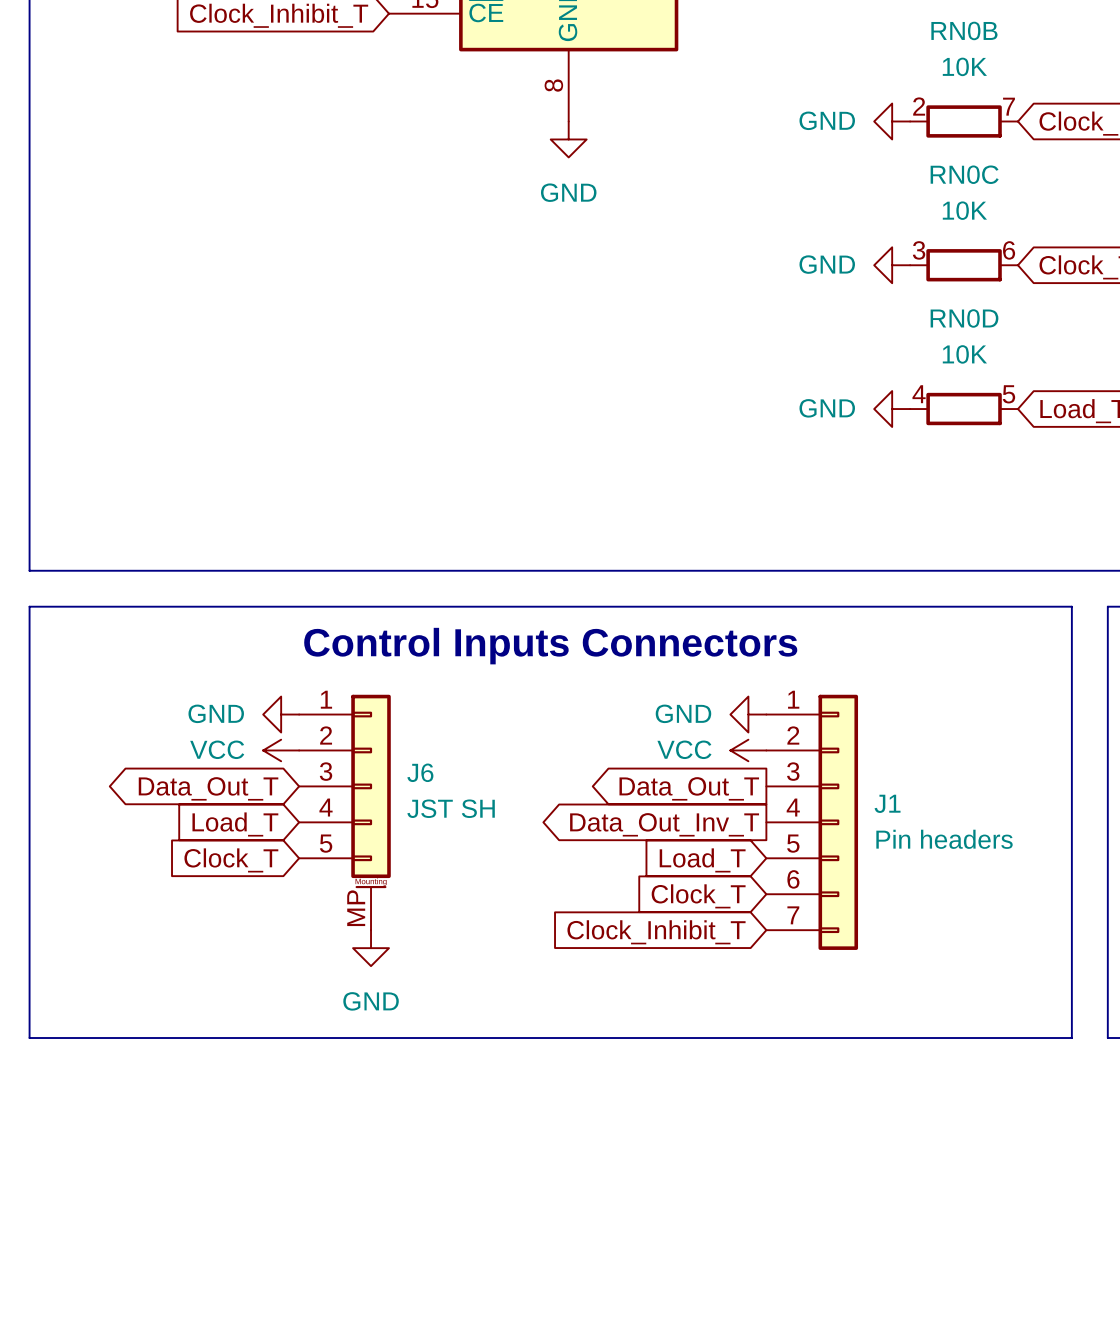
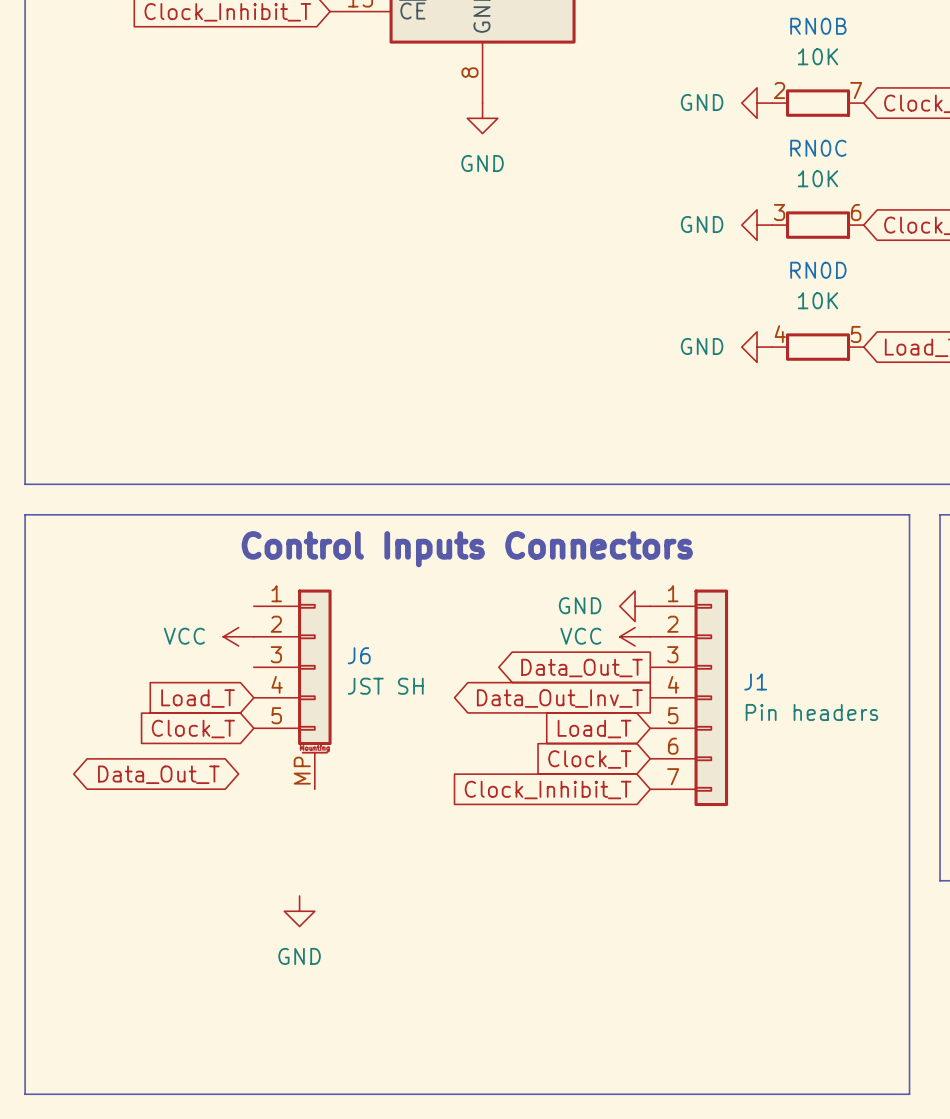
power symbol: GND (281, 714) -> none
global label position: Data_Out_T (208, 788) -> Data_Out_T (158, 774)
power symbol position: GND (371, 948) -> GND (299, 911)
line: (29, 1038) (1071, 1038) -> (25, 880) (25, 1094) (909, 1094) (909, 880)

